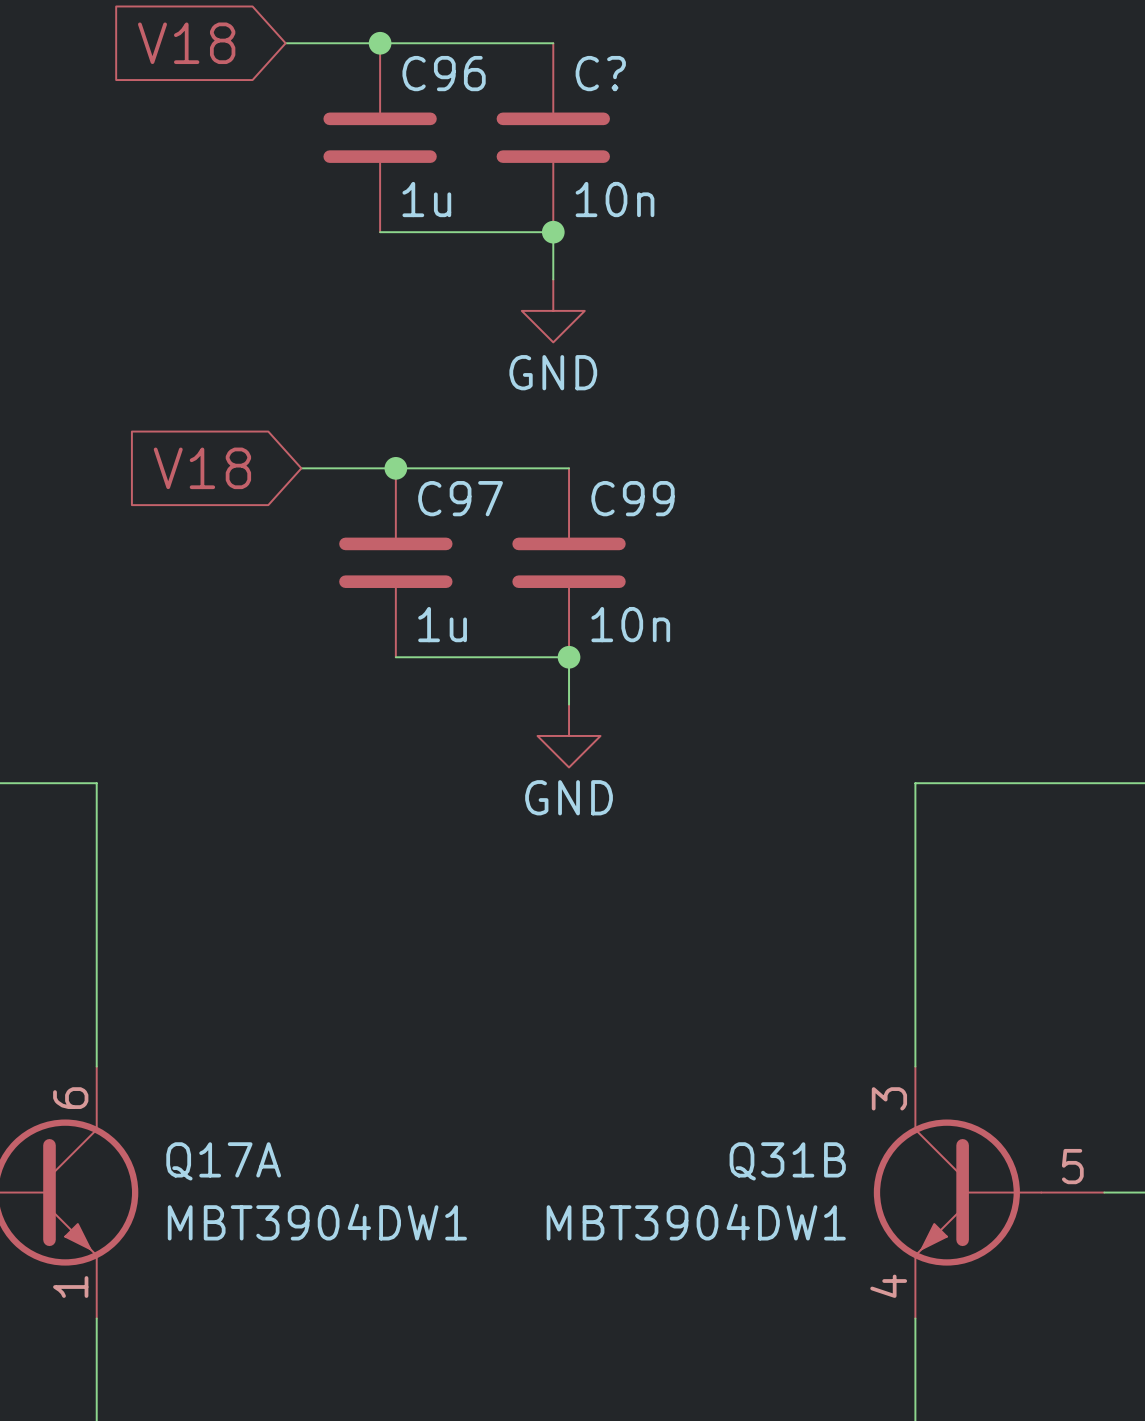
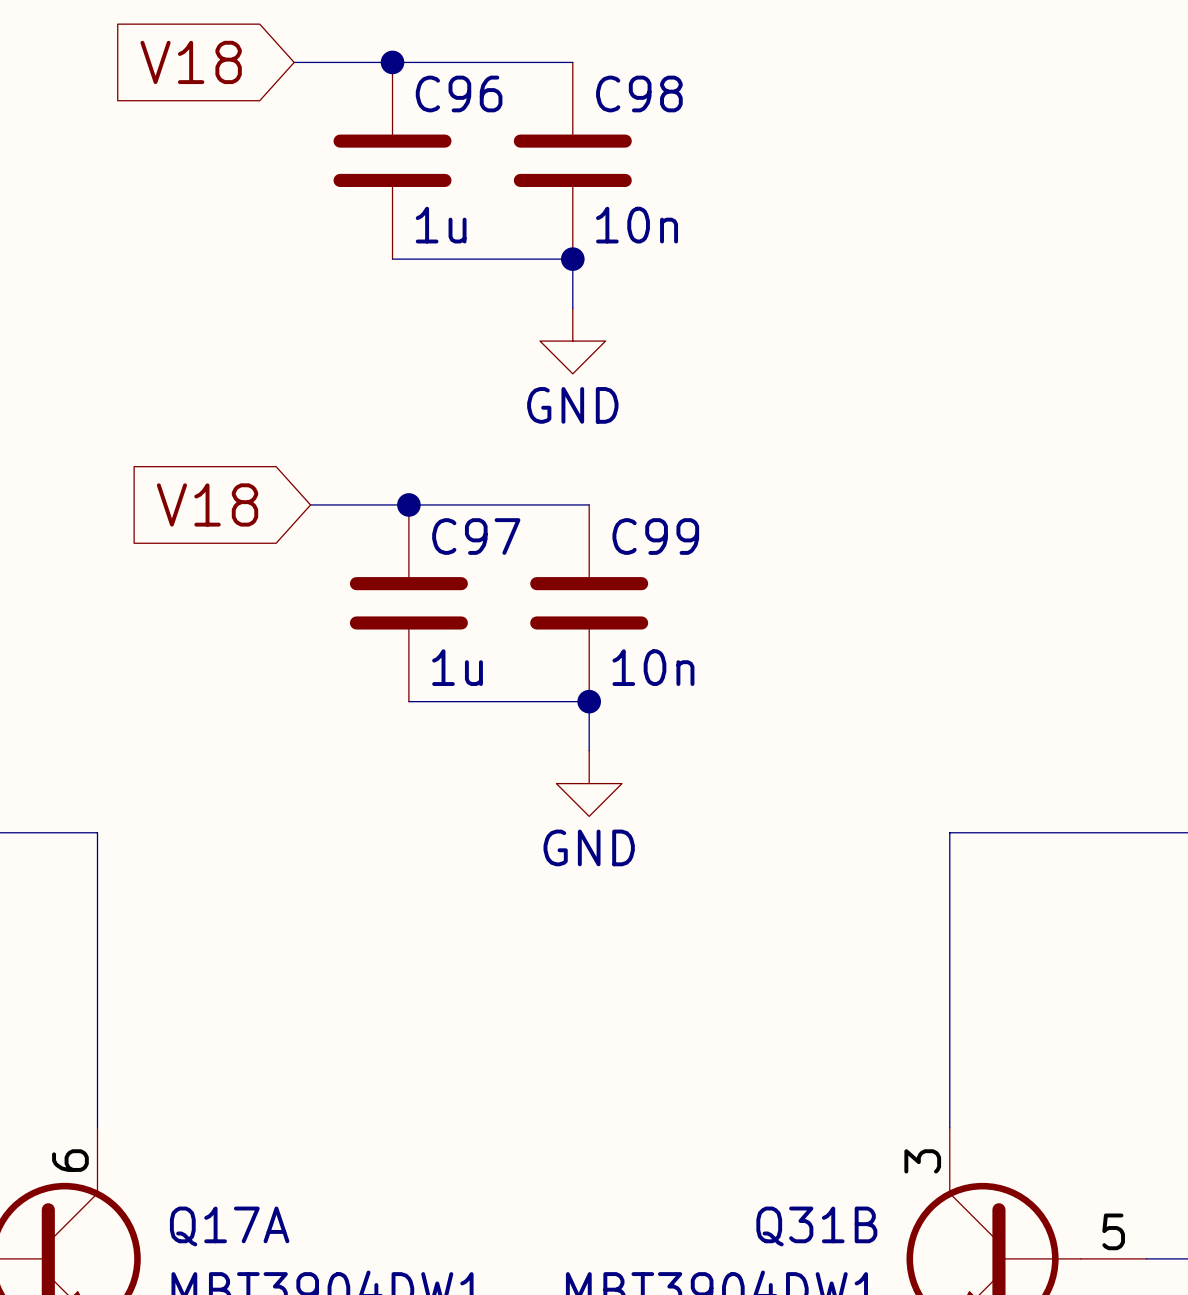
C? name: C? (600, 73) -> C98 (639, 93)

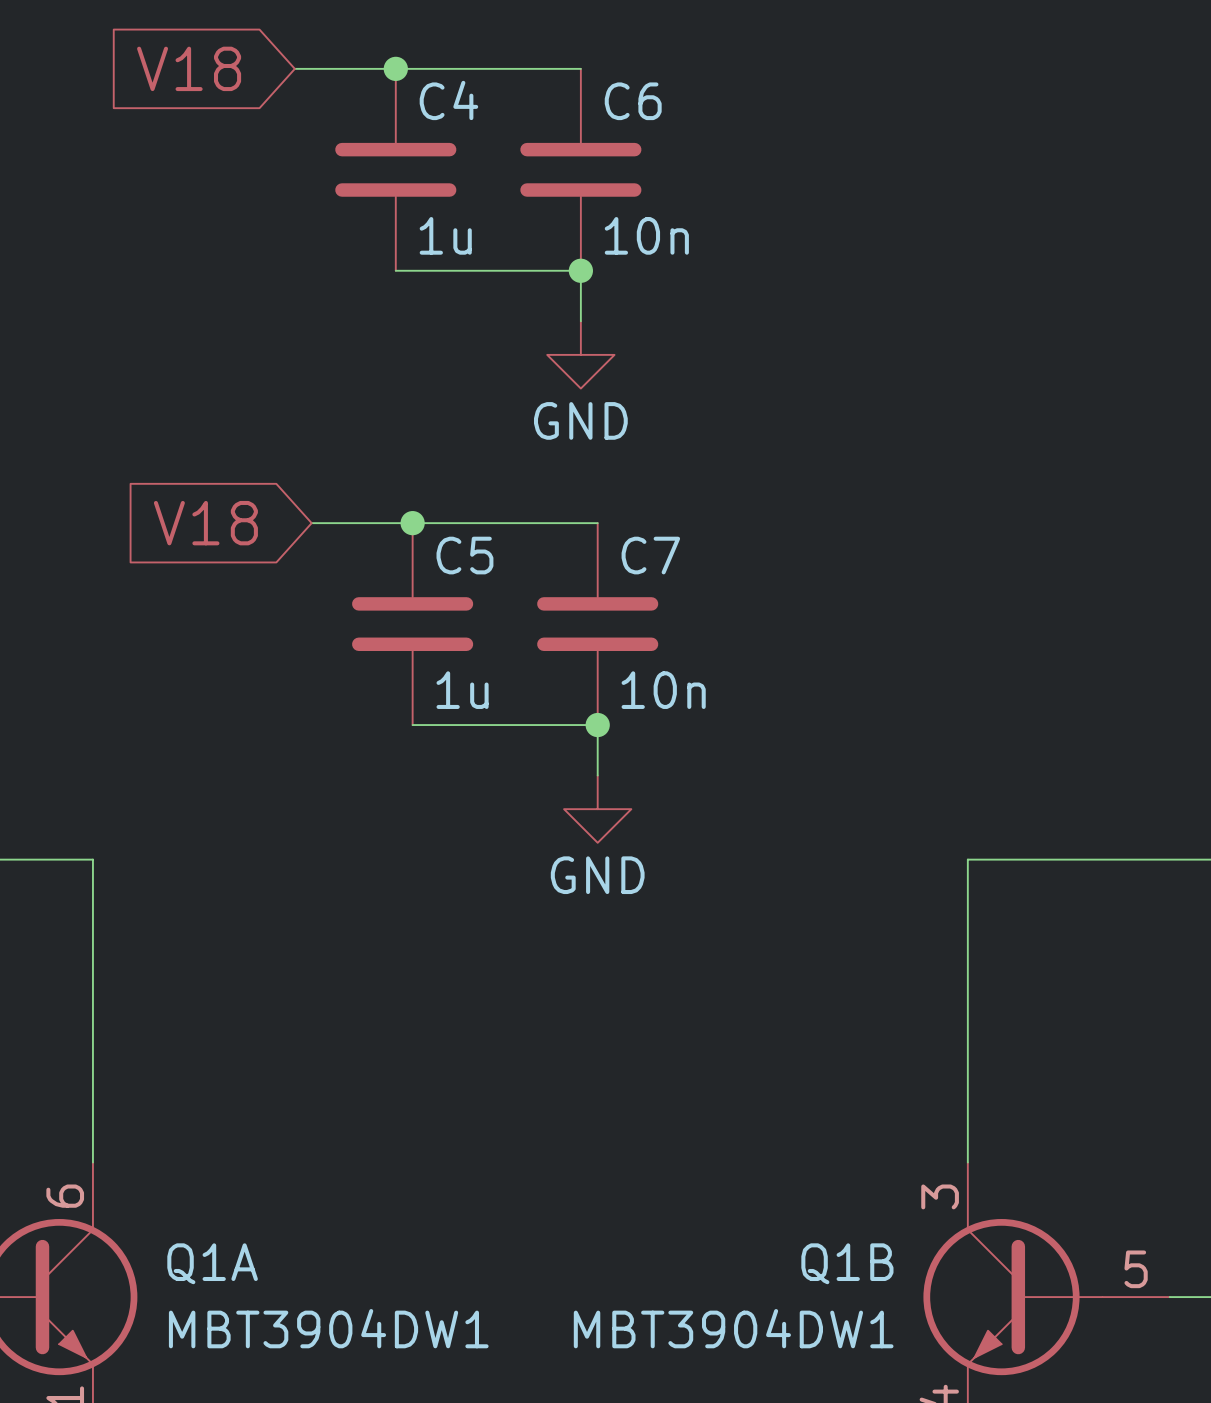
C96 name: C96 (459, 93) -> C4 (448, 100)
C98 name: C98 (639, 93) -> C6 (633, 101)
C97 name: C97 (476, 536) -> C5 (464, 555)
C99 name: C99 (655, 536) -> C7 (650, 555)
Q17A name: Q17A (229, 1226) -> Q1A (212, 1263)
Q31B name: Q31B (816, 1226) -> Q1B (847, 1263)

